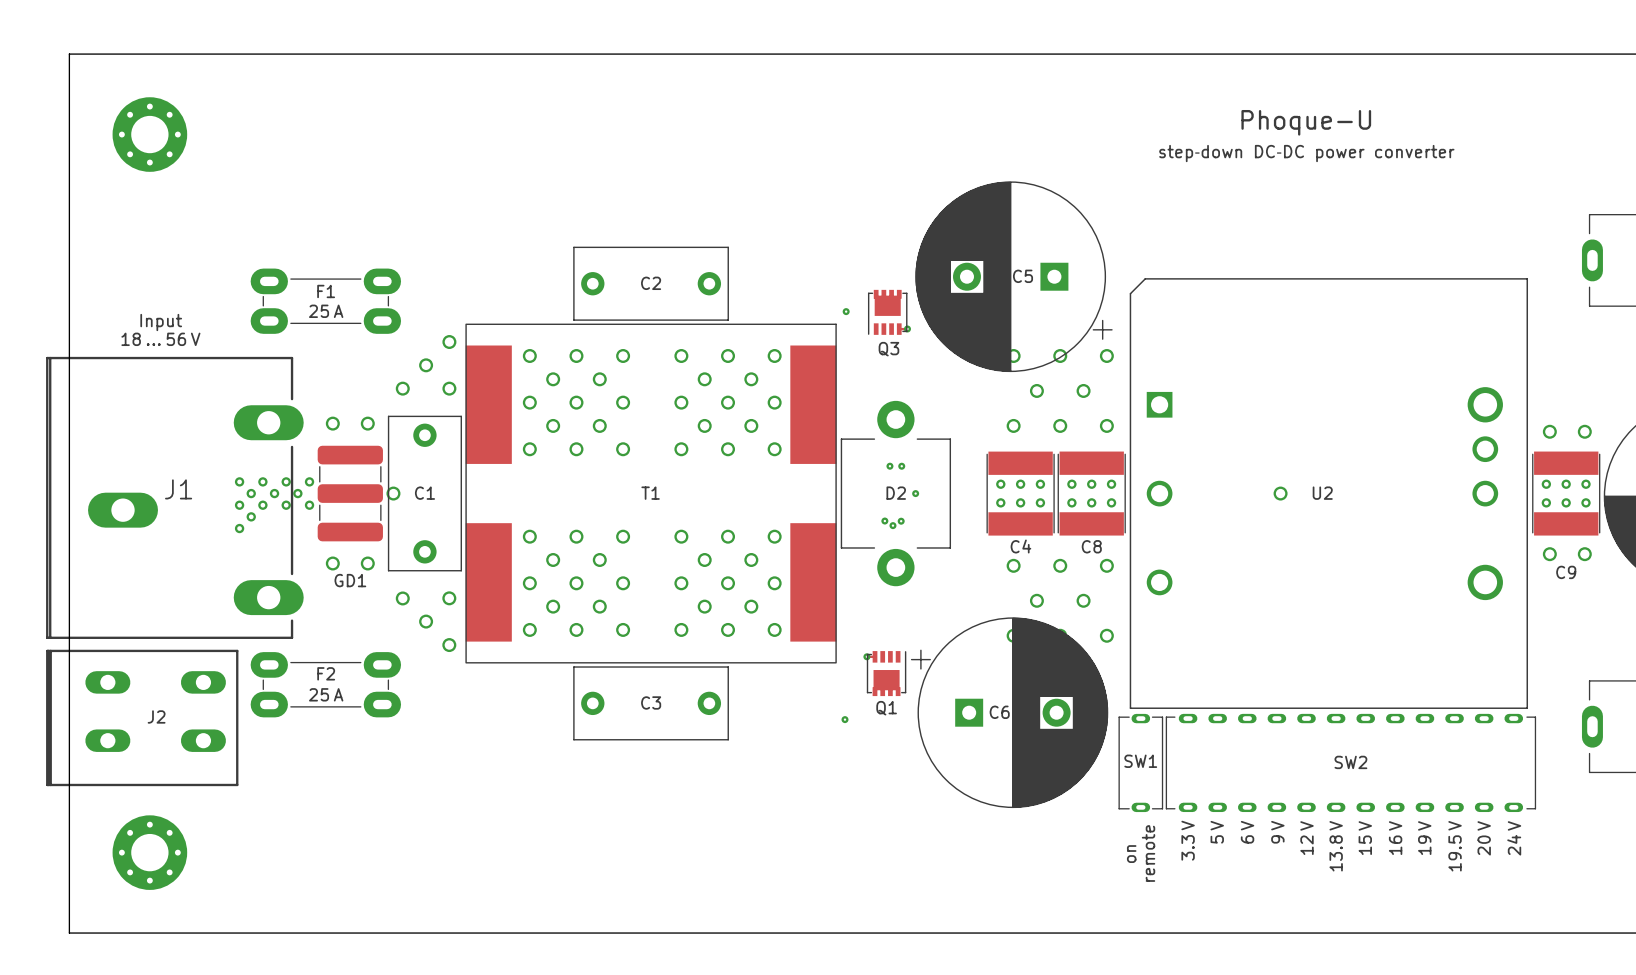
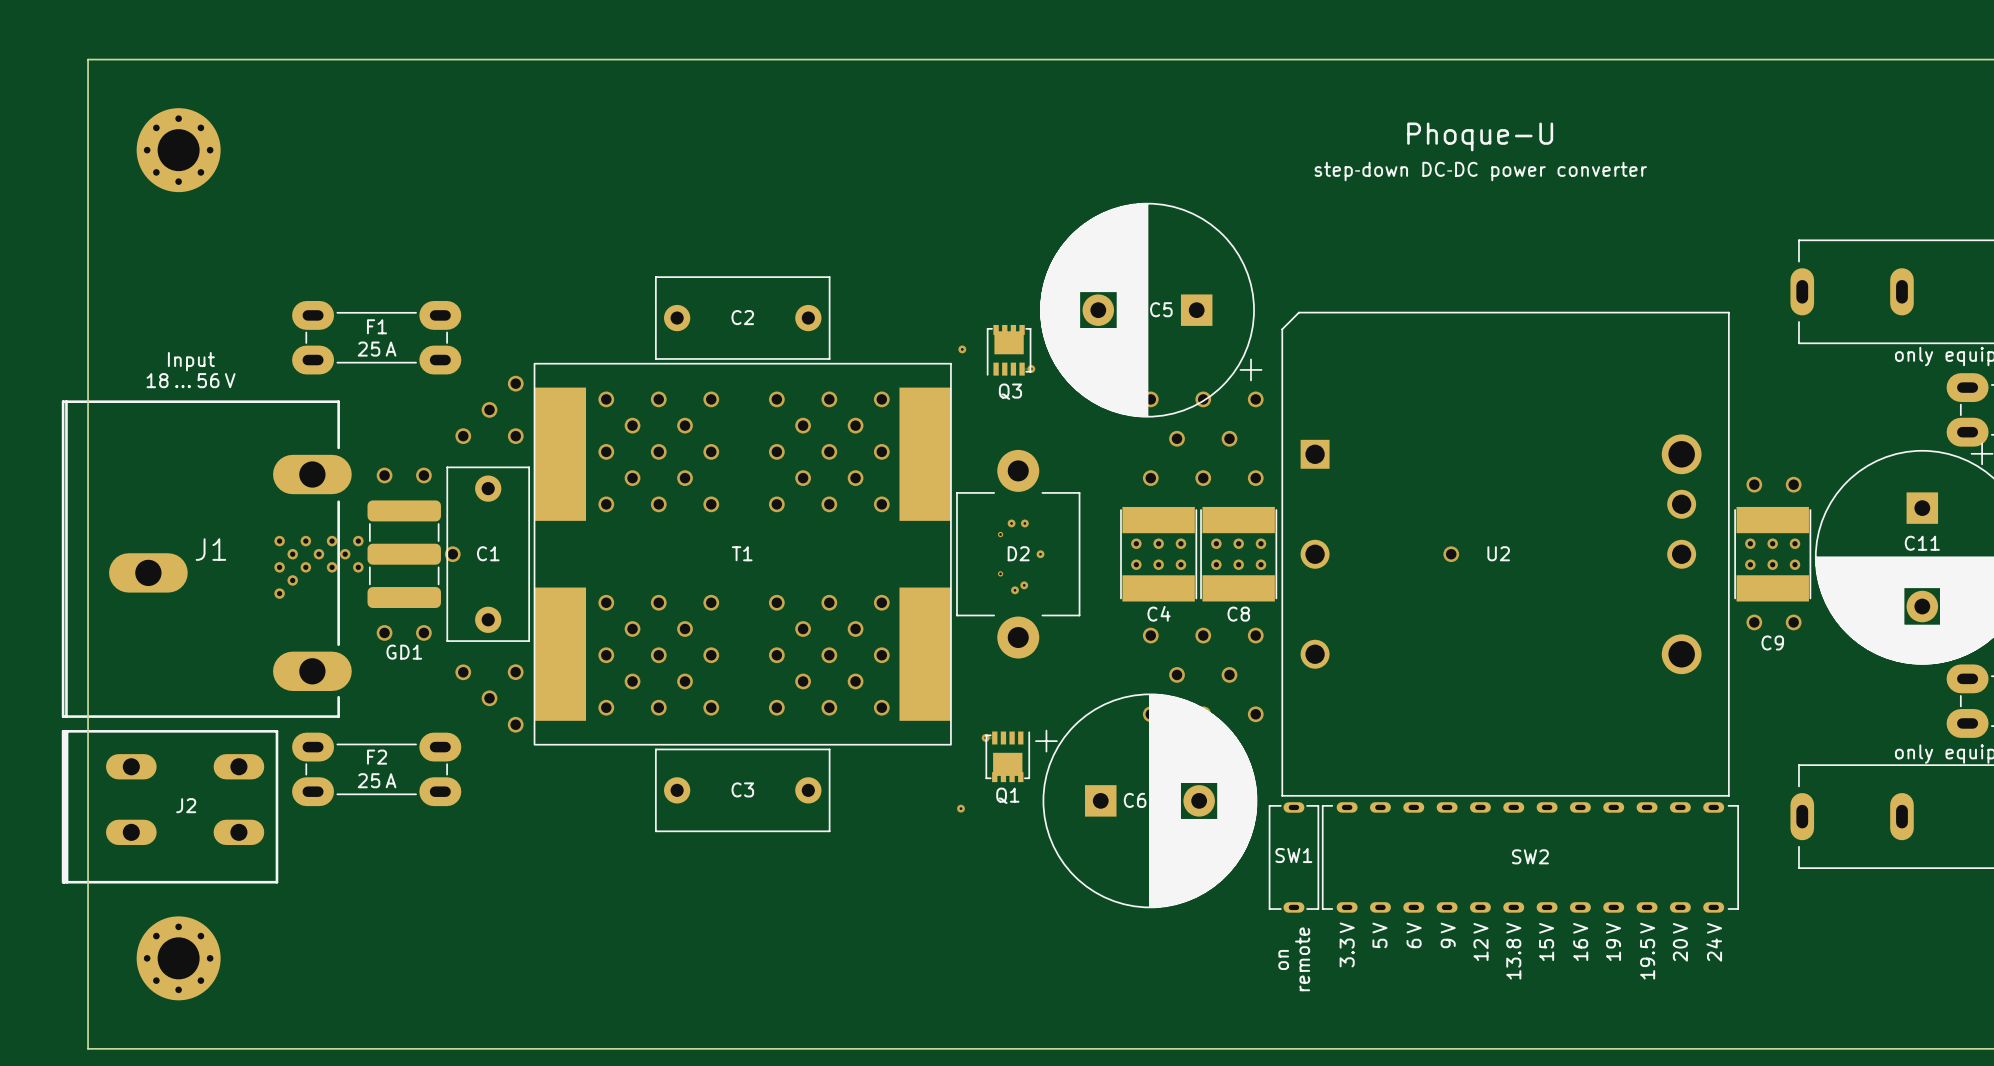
via: none -> (1000, 534)
via: none -> (1000, 573)
via: (884, 521) -> none

